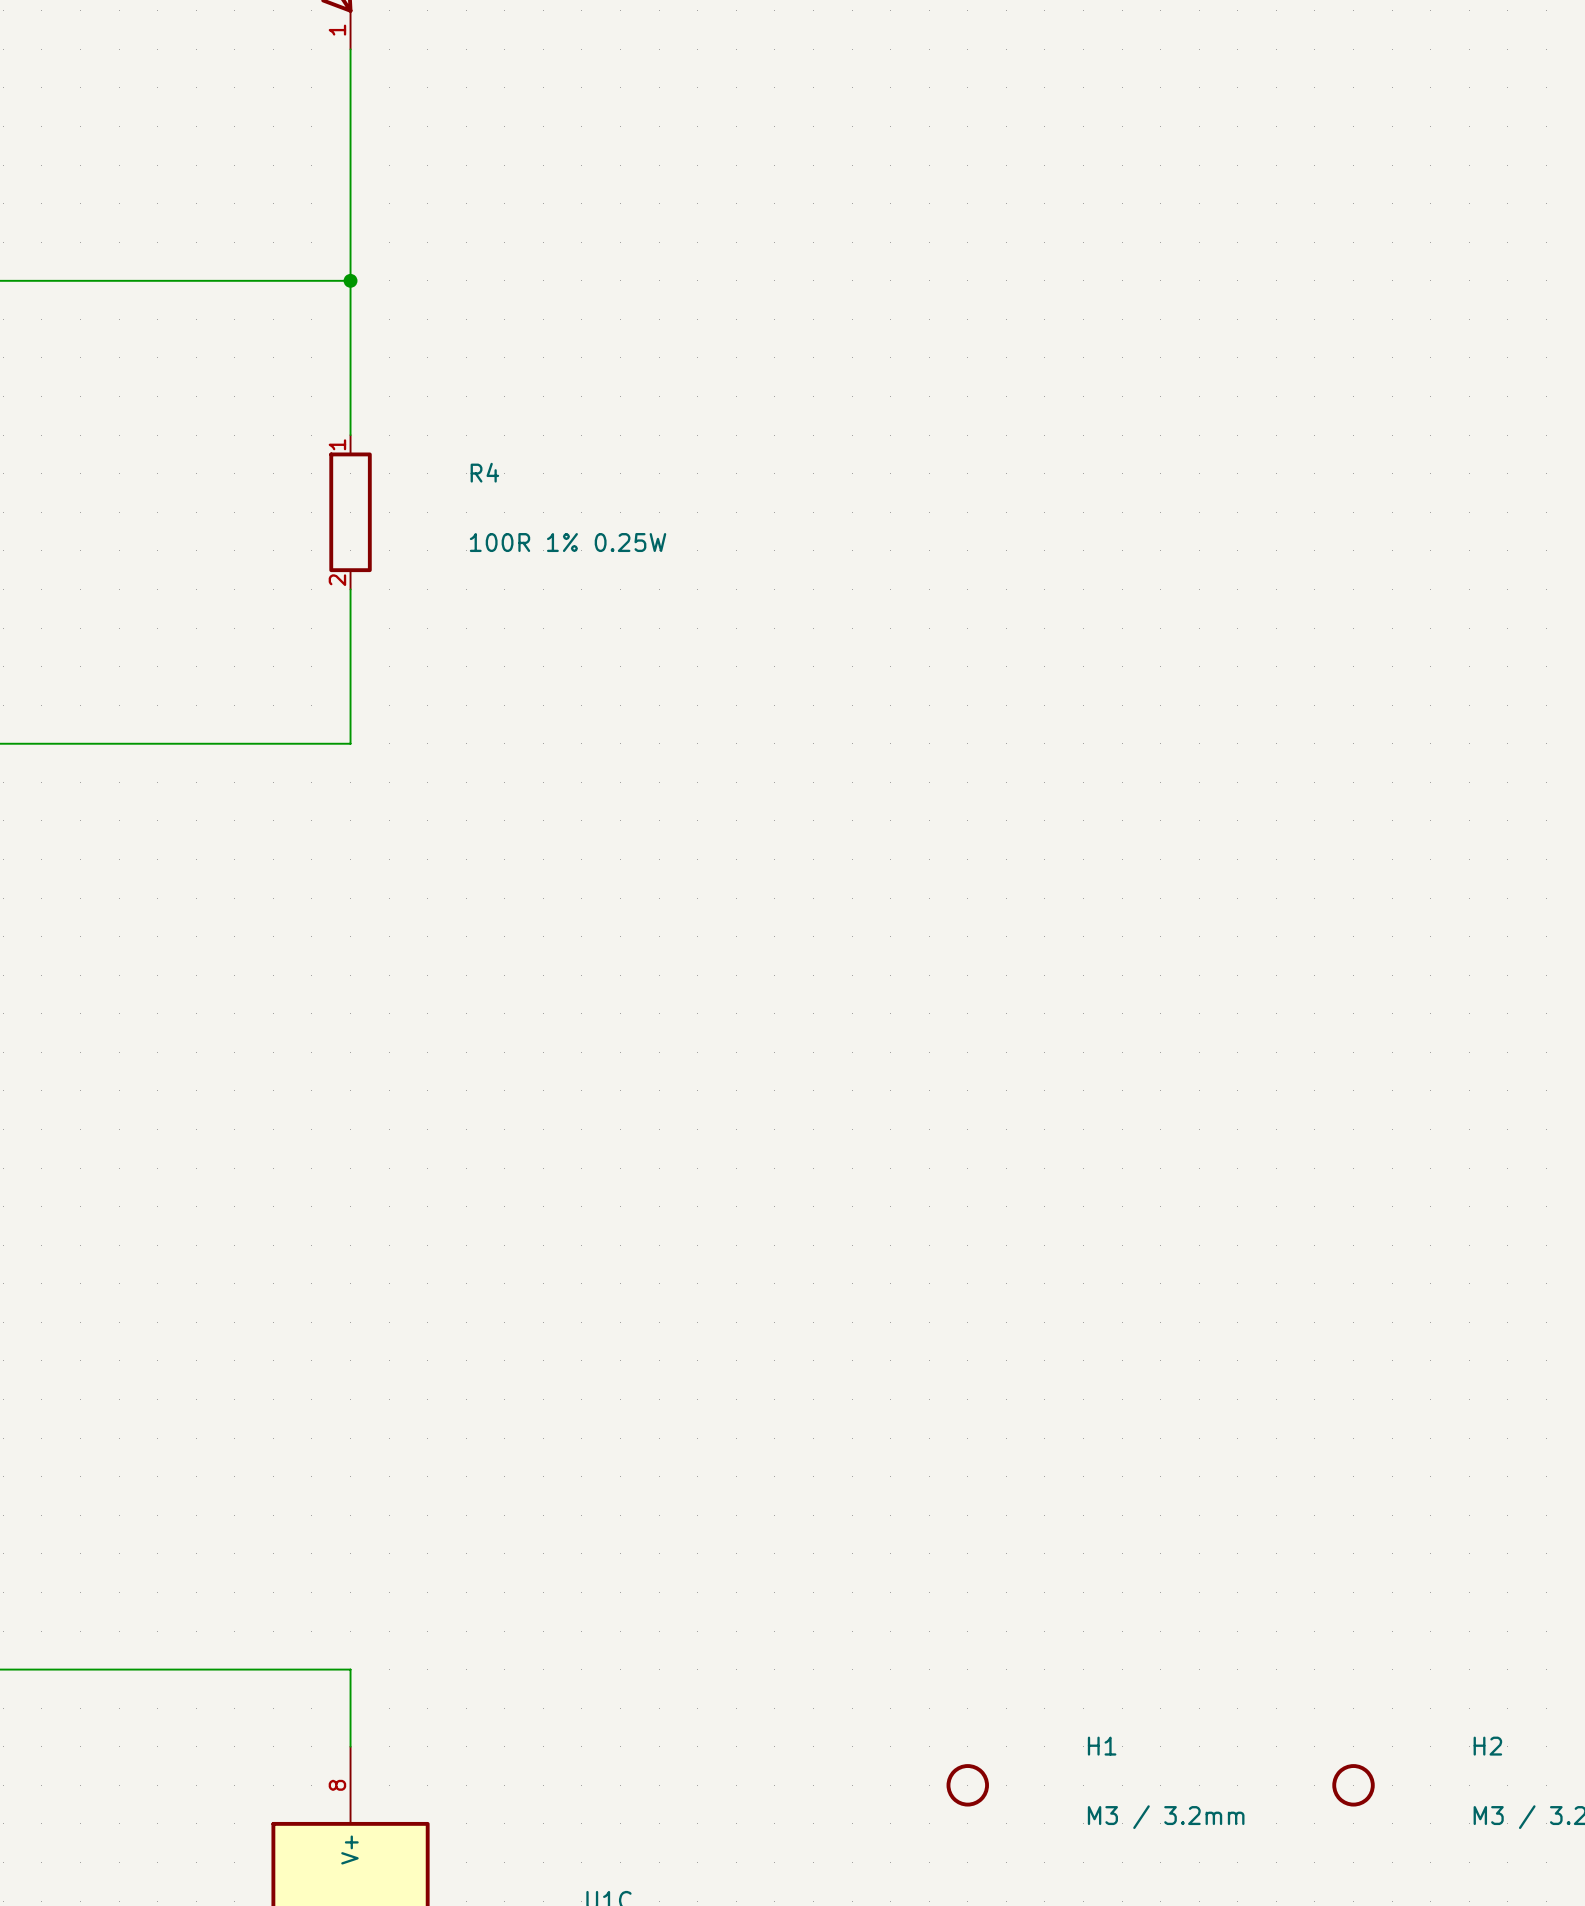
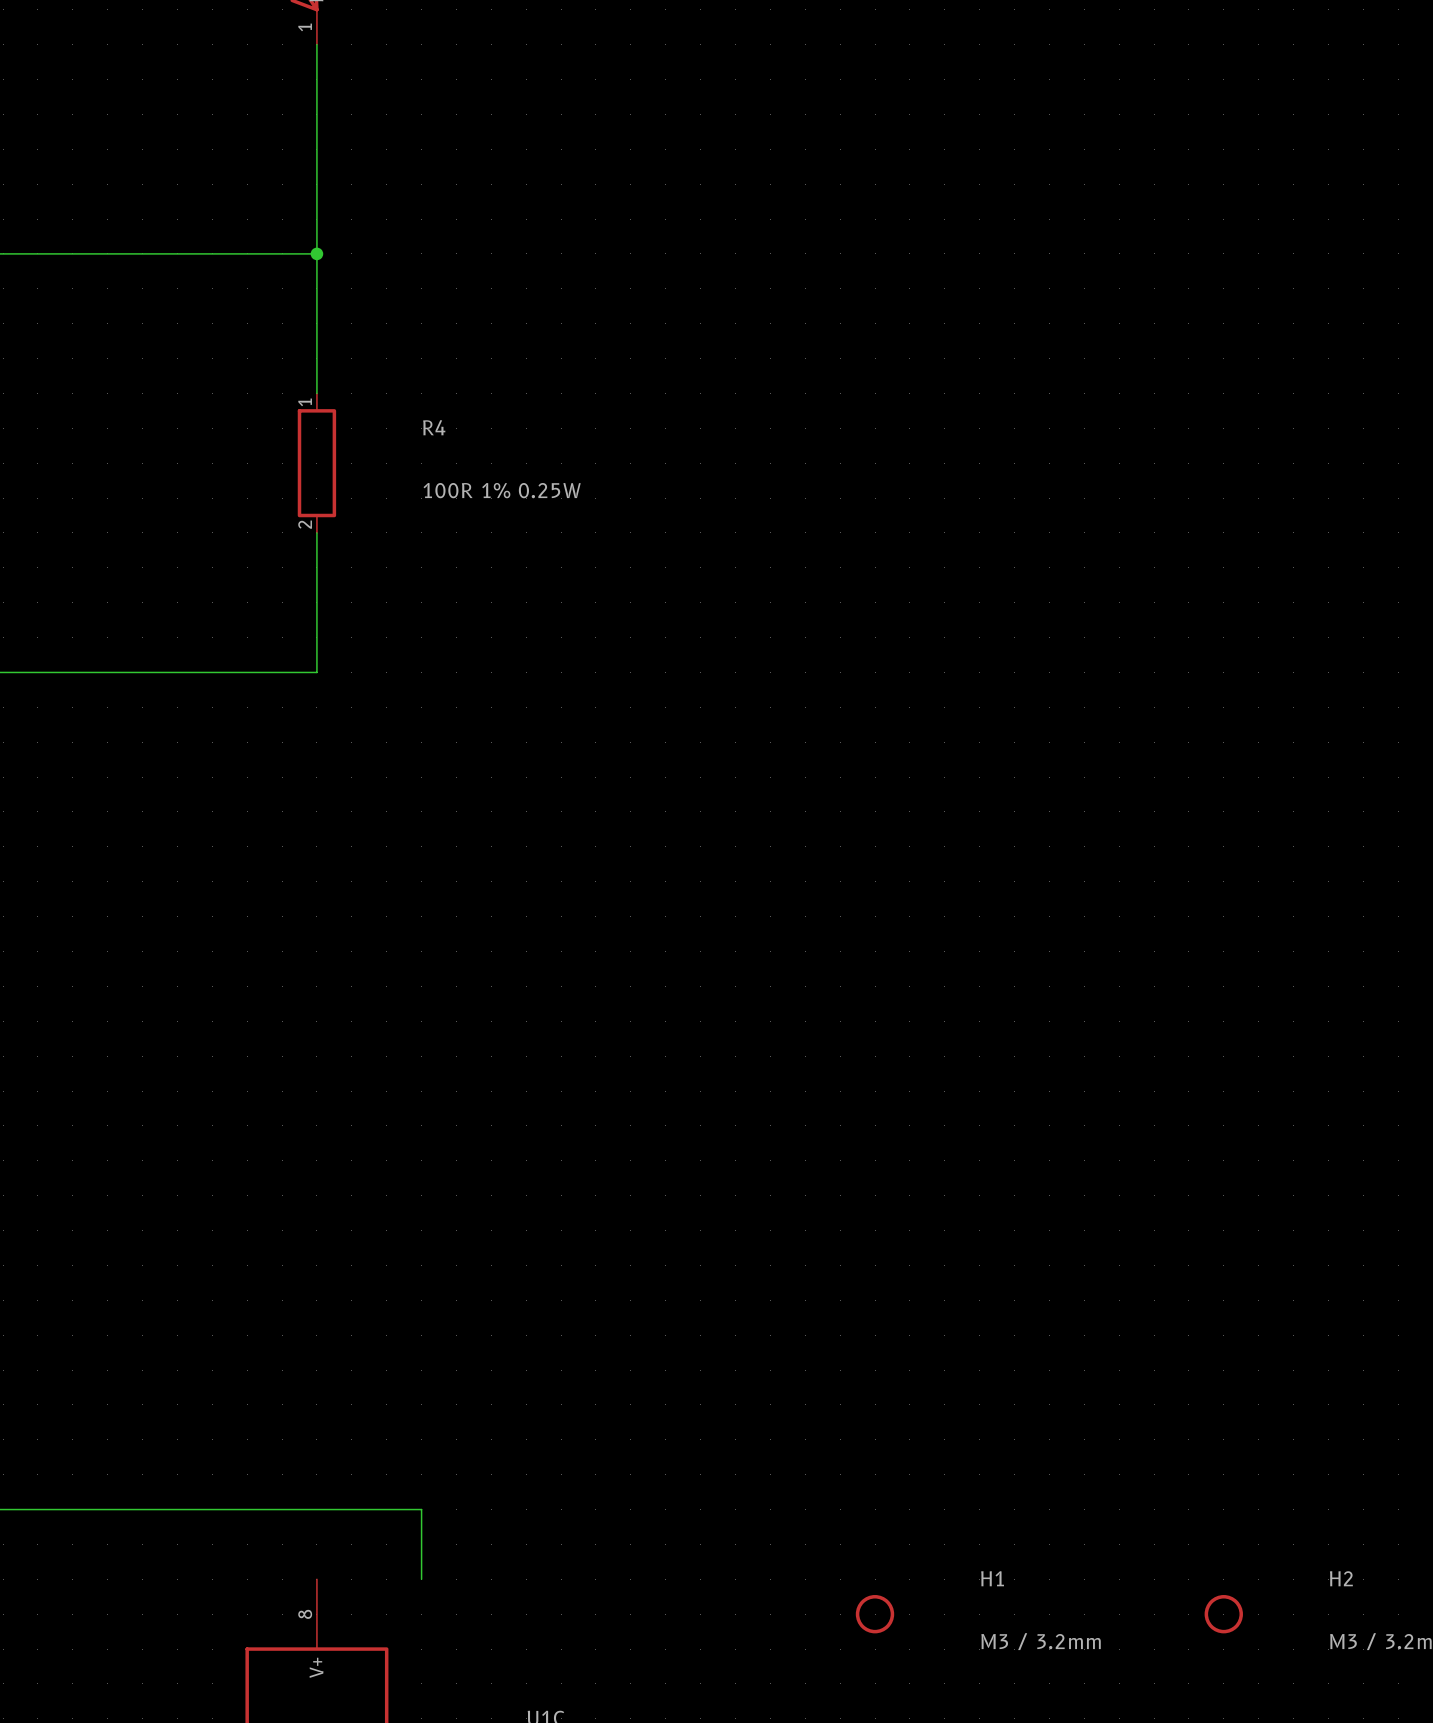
wire: (350, 1669) (350, 1746) -> (316, 1509) (421, 1509) (421, 1579)

